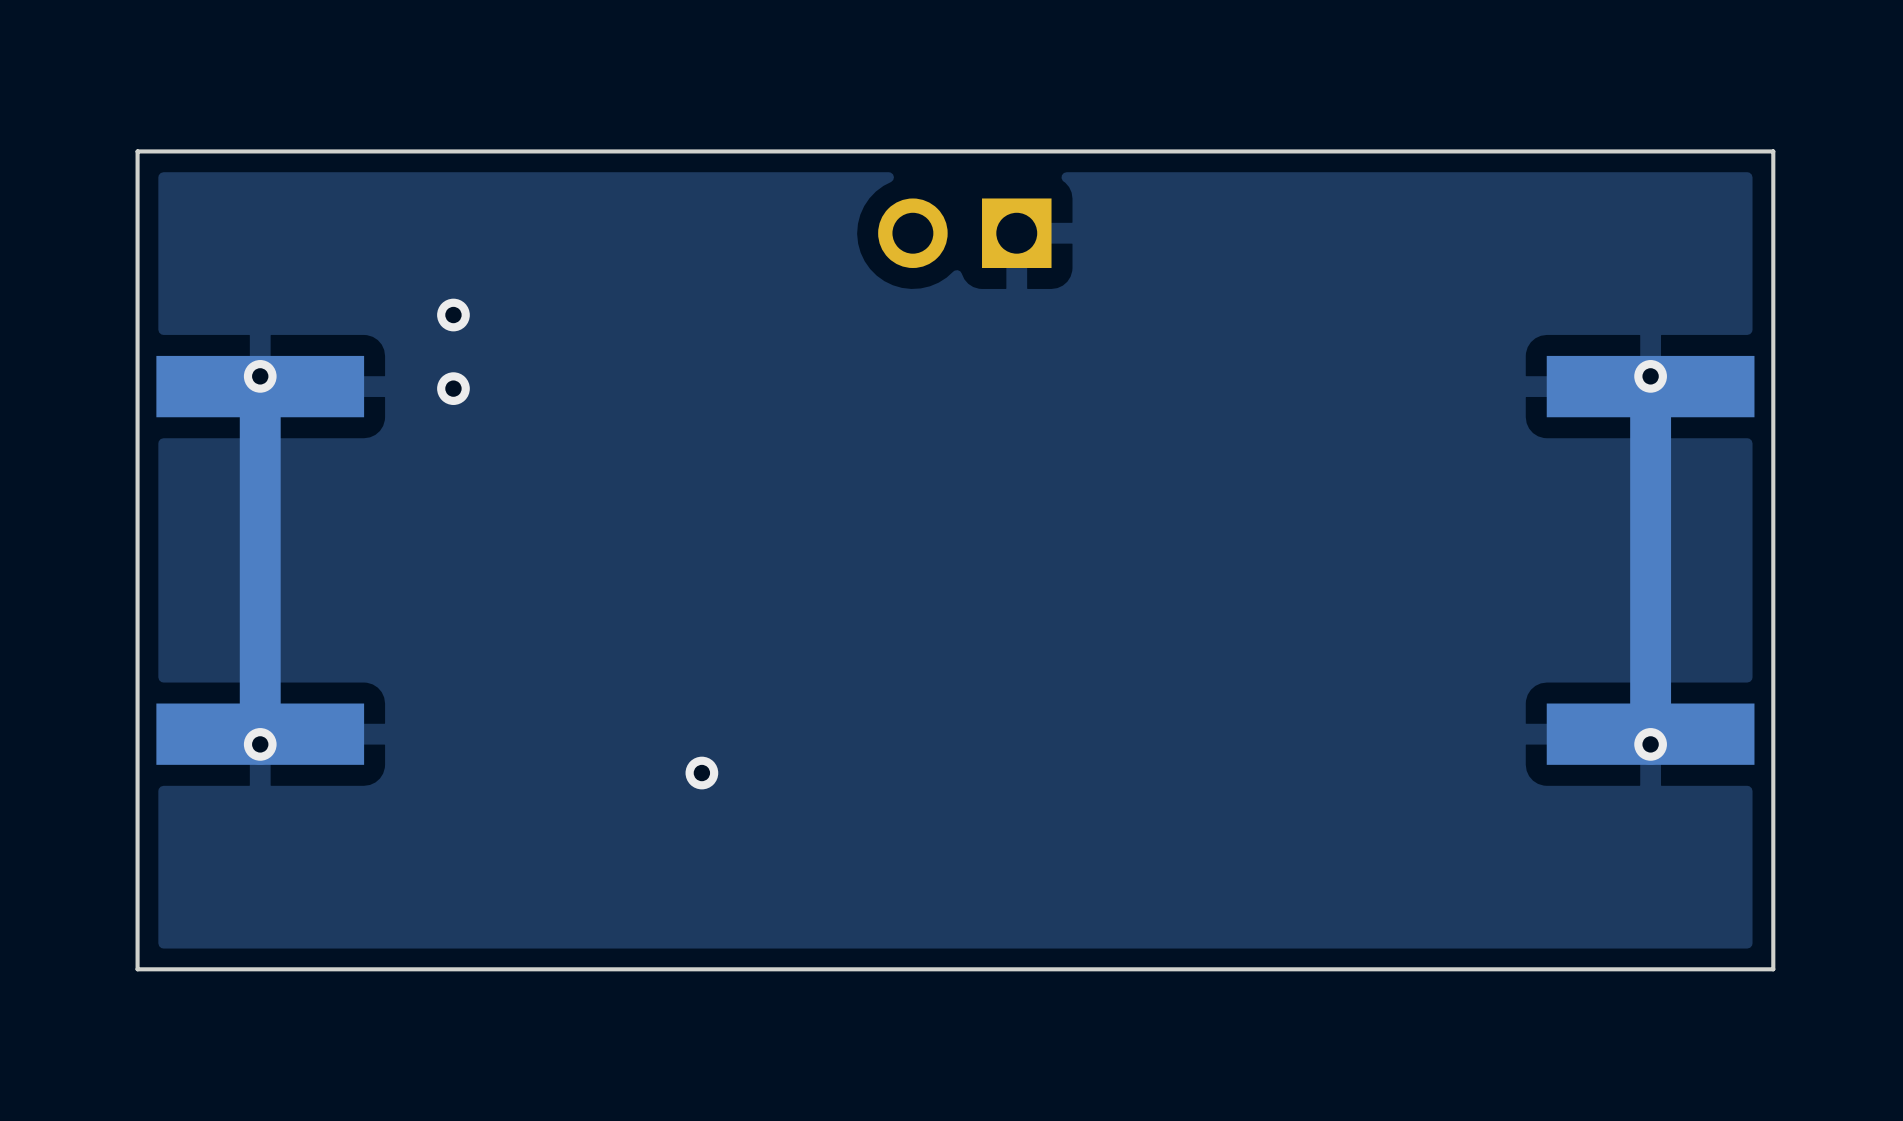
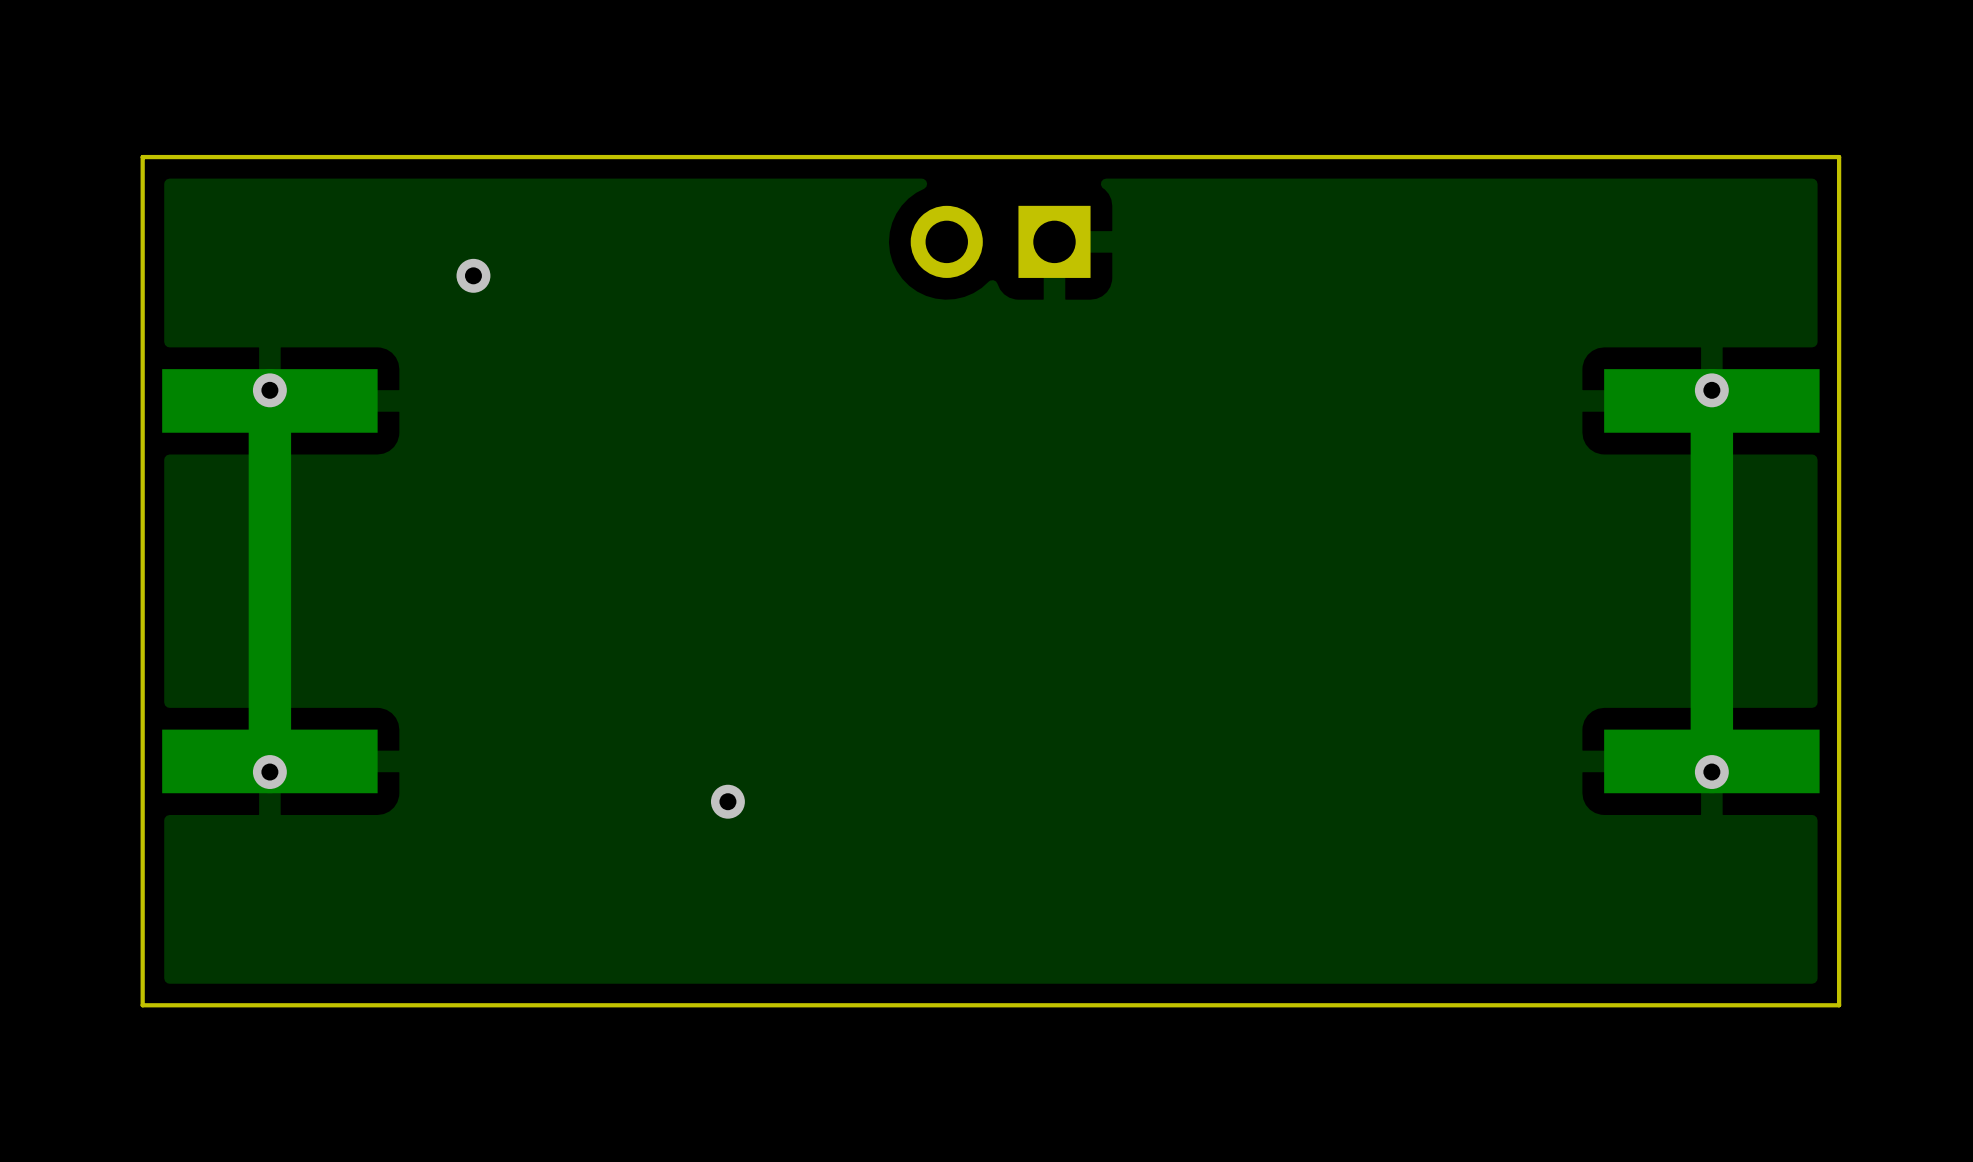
via position: (453, 315) -> (473, 275)
via: (453, 388) -> none

